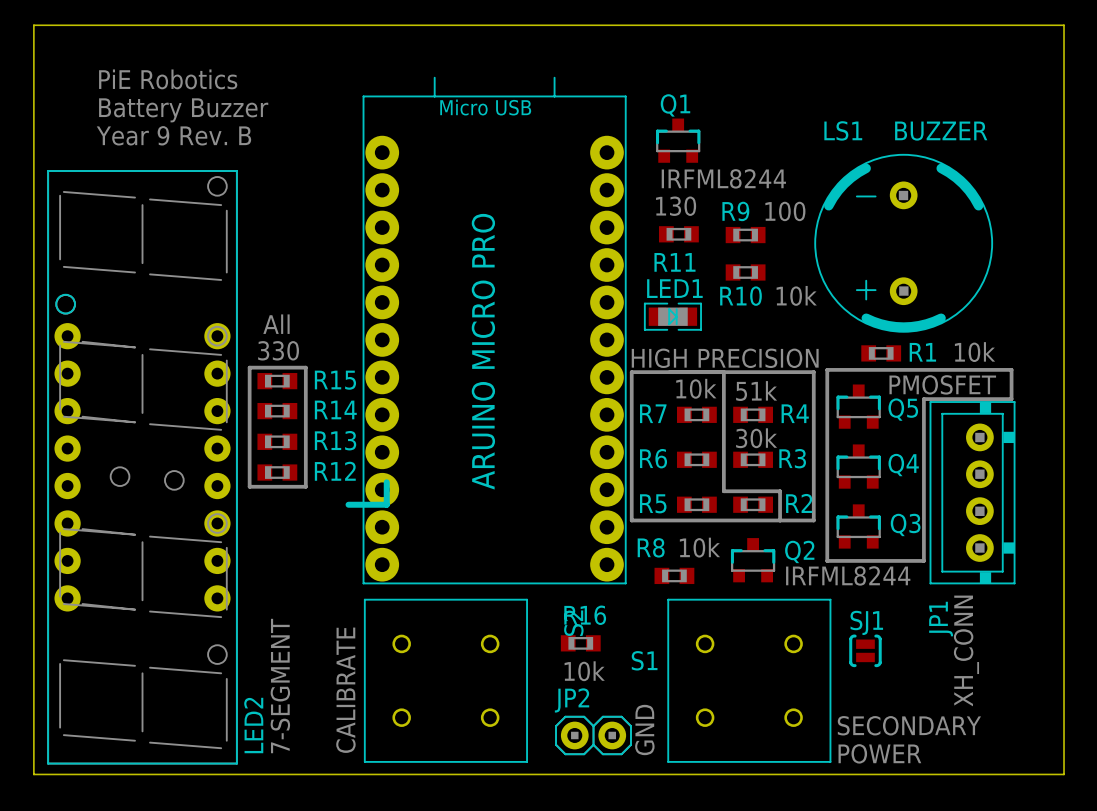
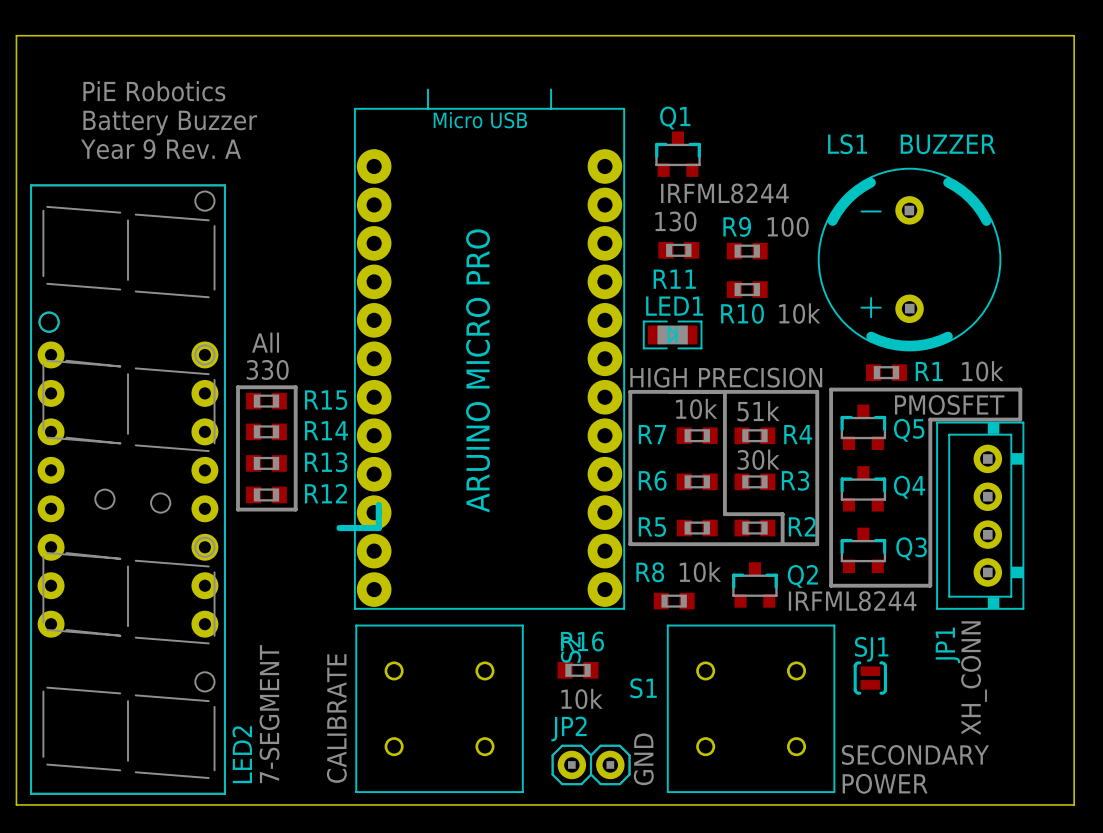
text: Year 9 Rev. B (173, 135) -> Year 9 Rev. A (160, 149)

